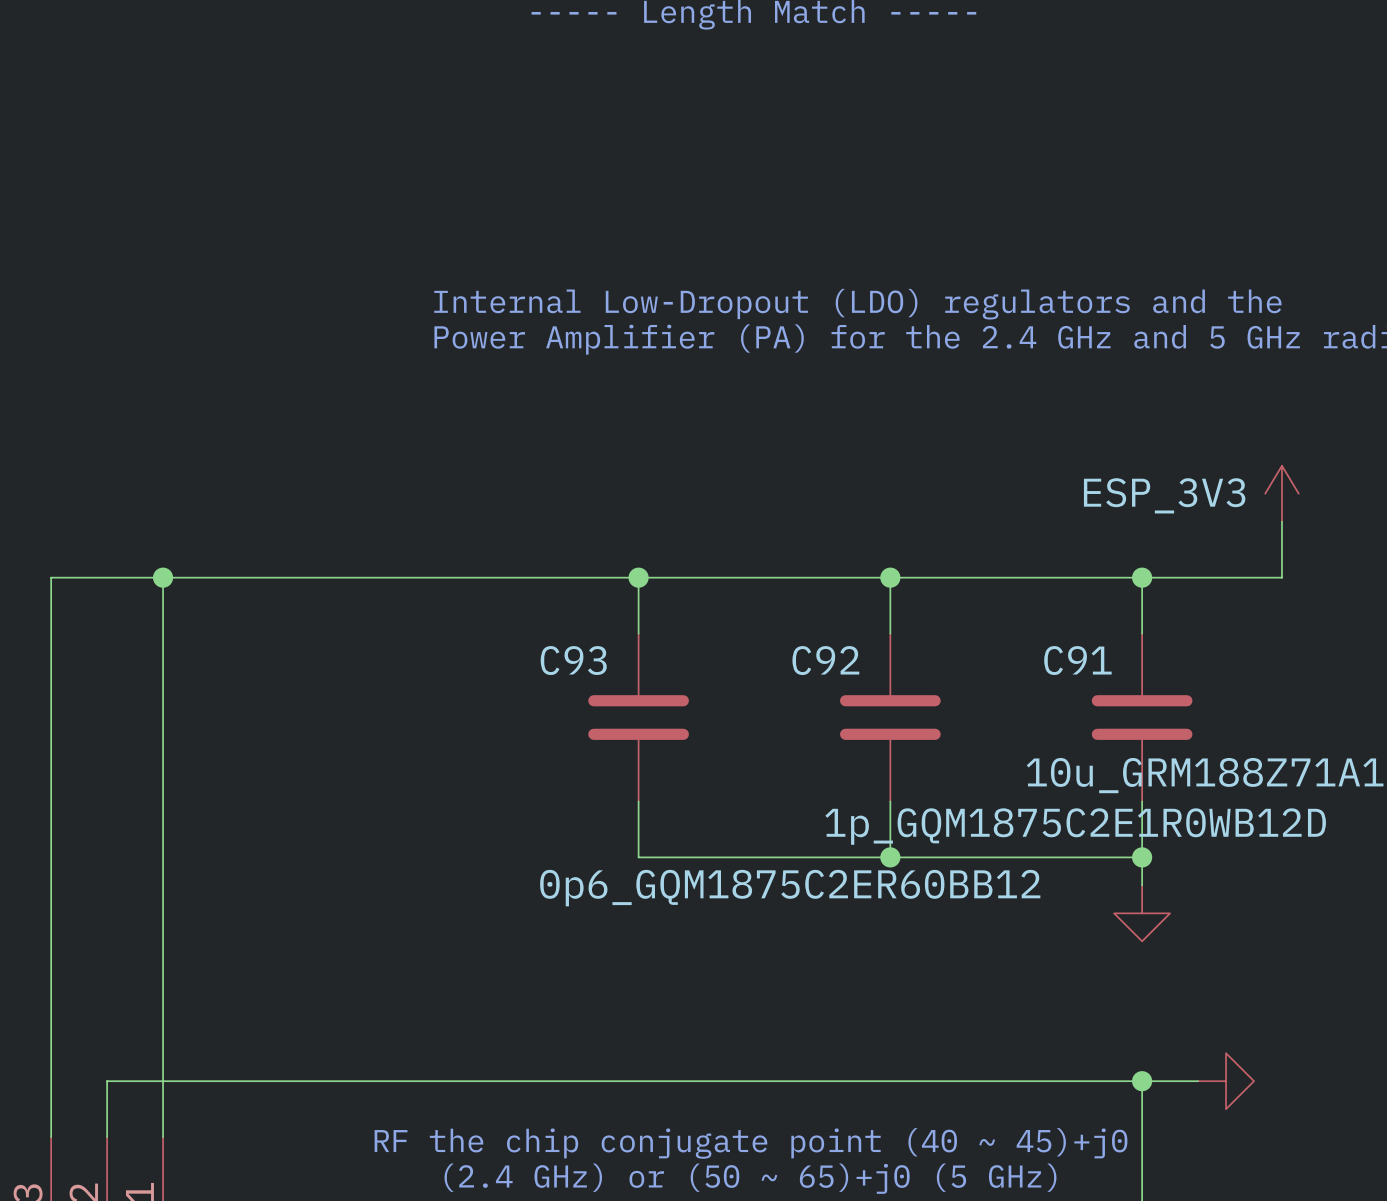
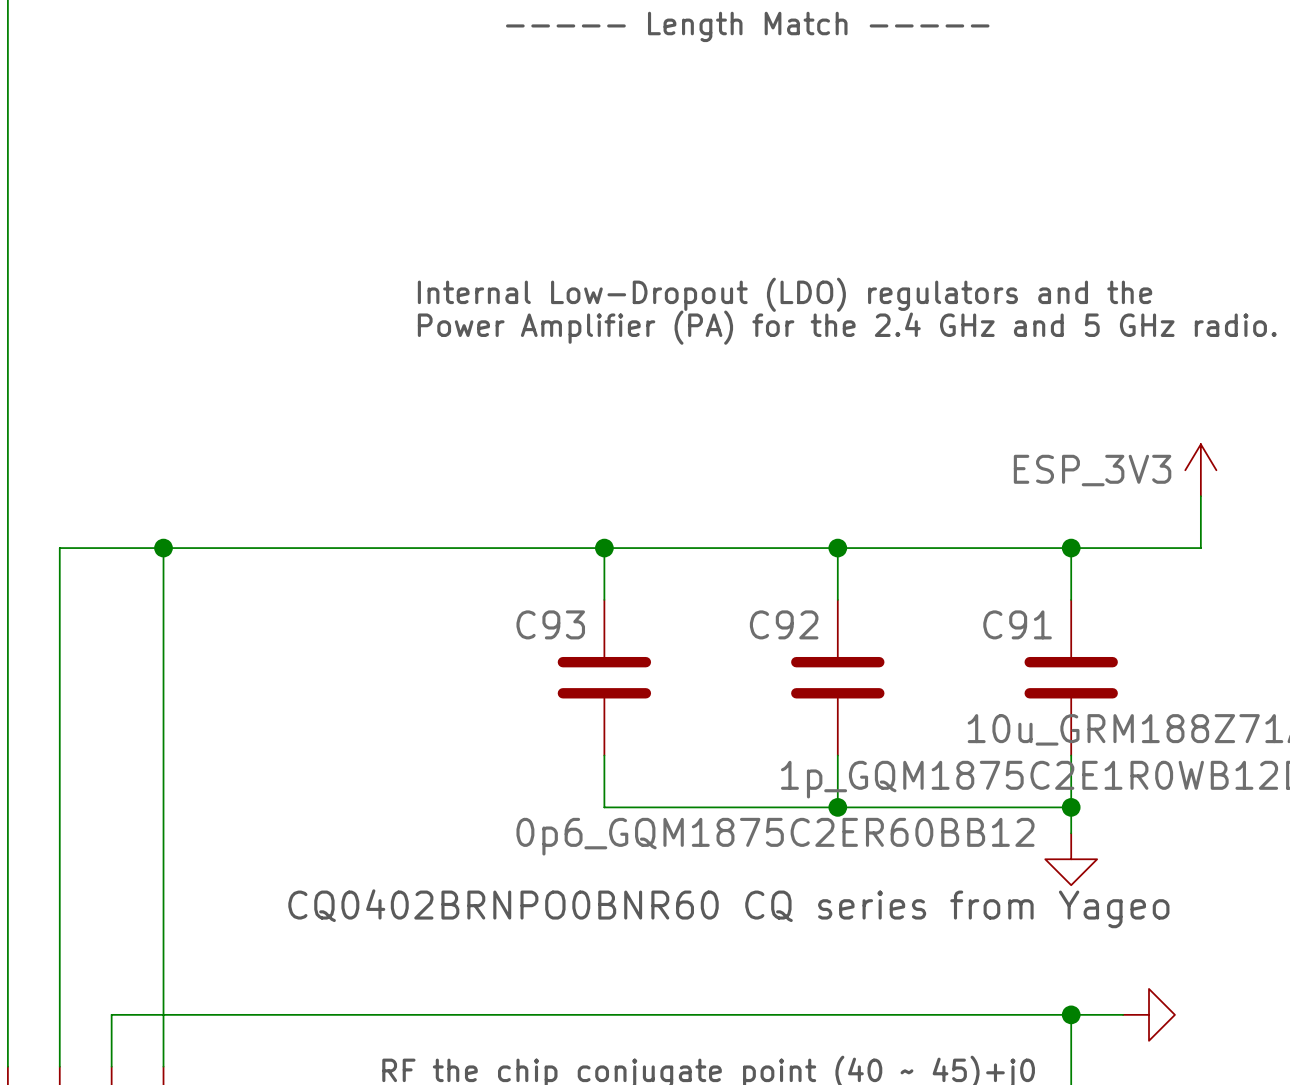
text: none -> CQ0402BRNPO0BNR60 CQ series from Yageo (728, 908)

